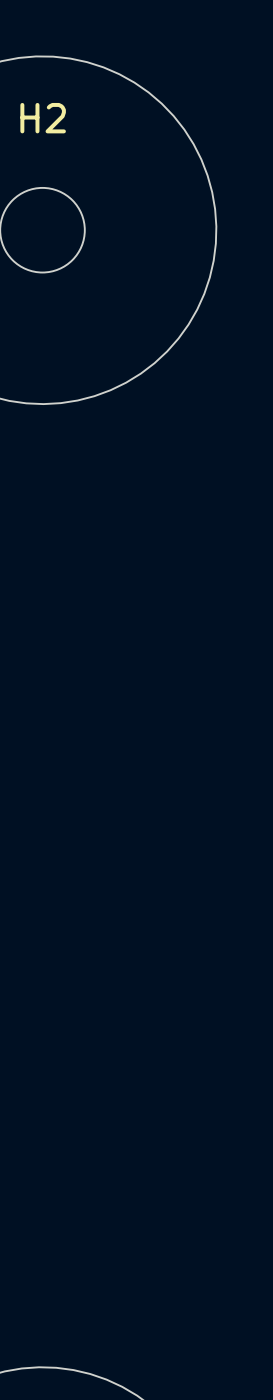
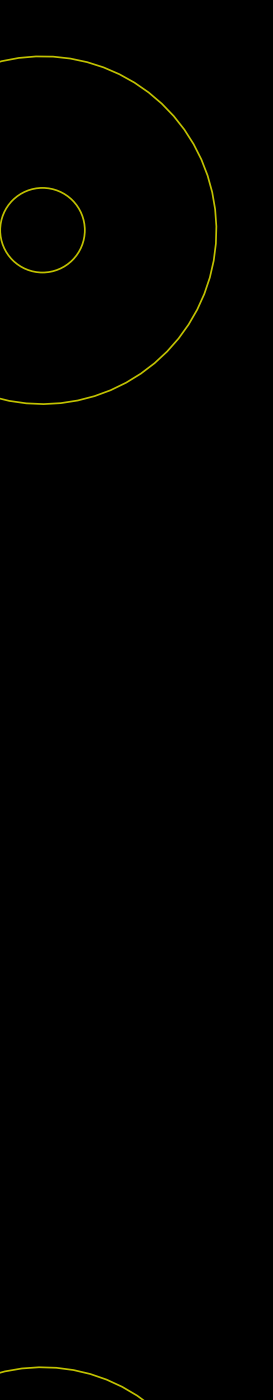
H2 name: H2 (43, 118) -> none

